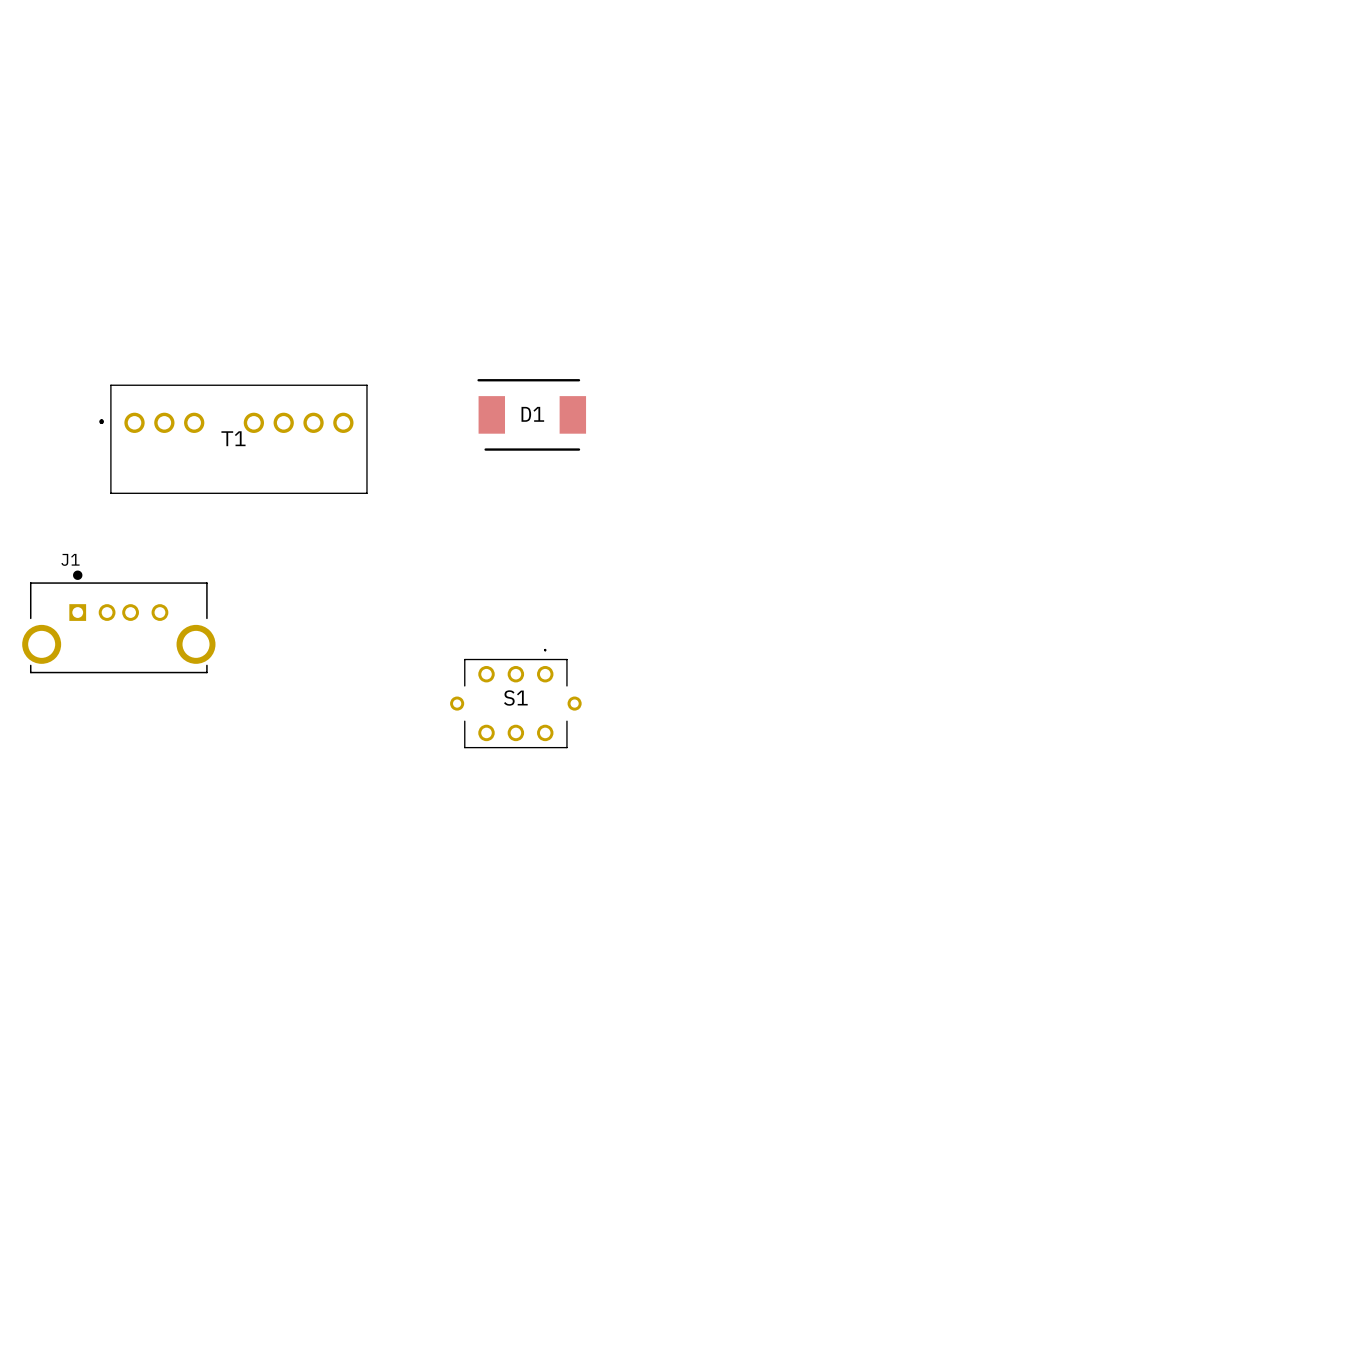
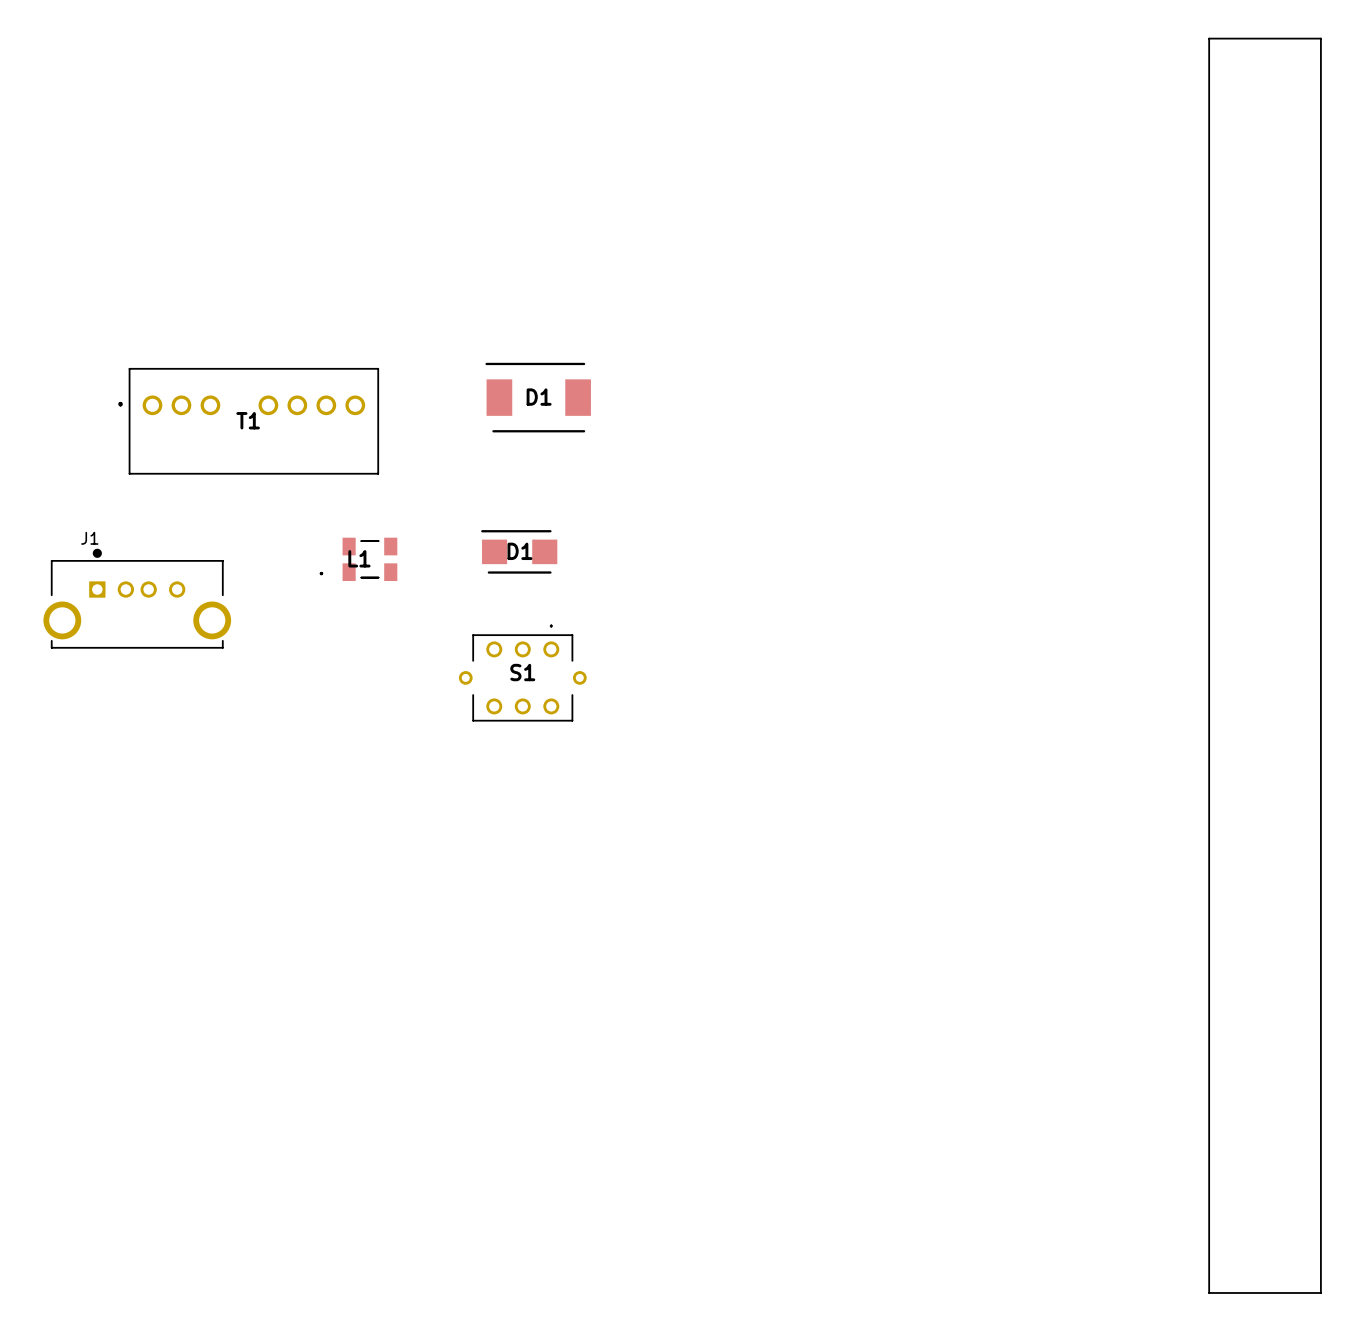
board edge: none -> (1209, 38) (1209, 1292) (1320, 1292) (1320, 38) (1209, 38)
D1: none -> (519, 551)
L1: none -> (358, 559)

